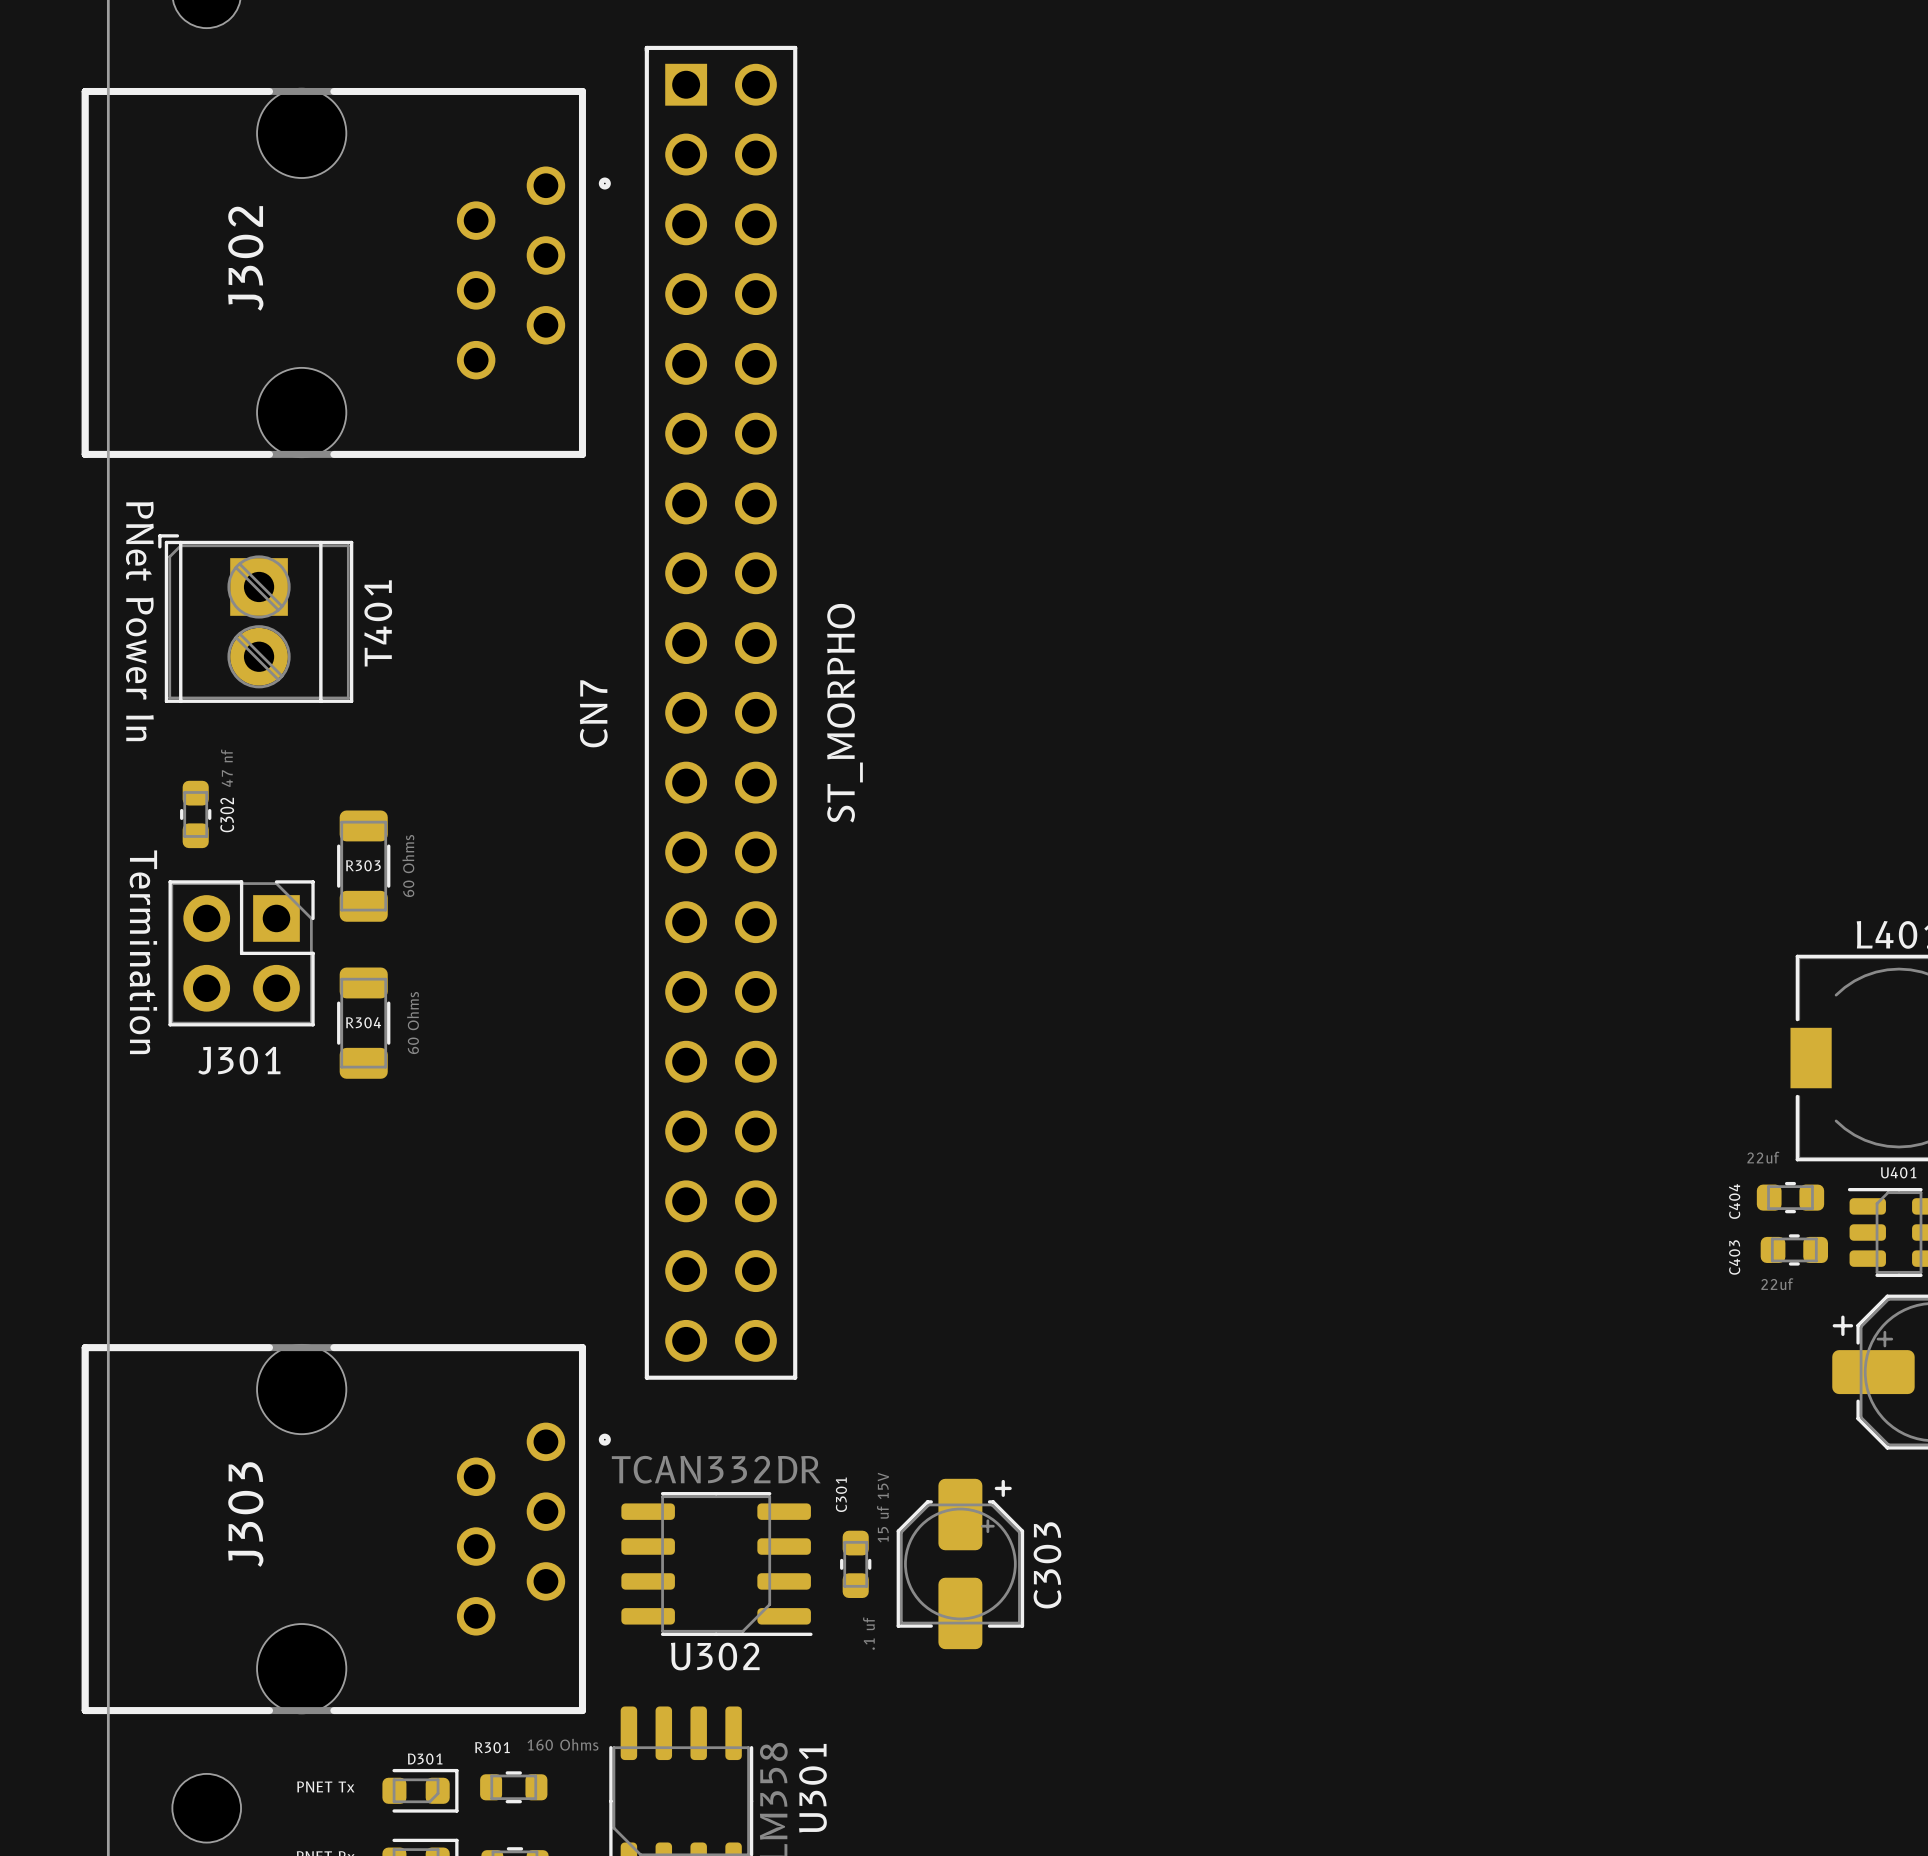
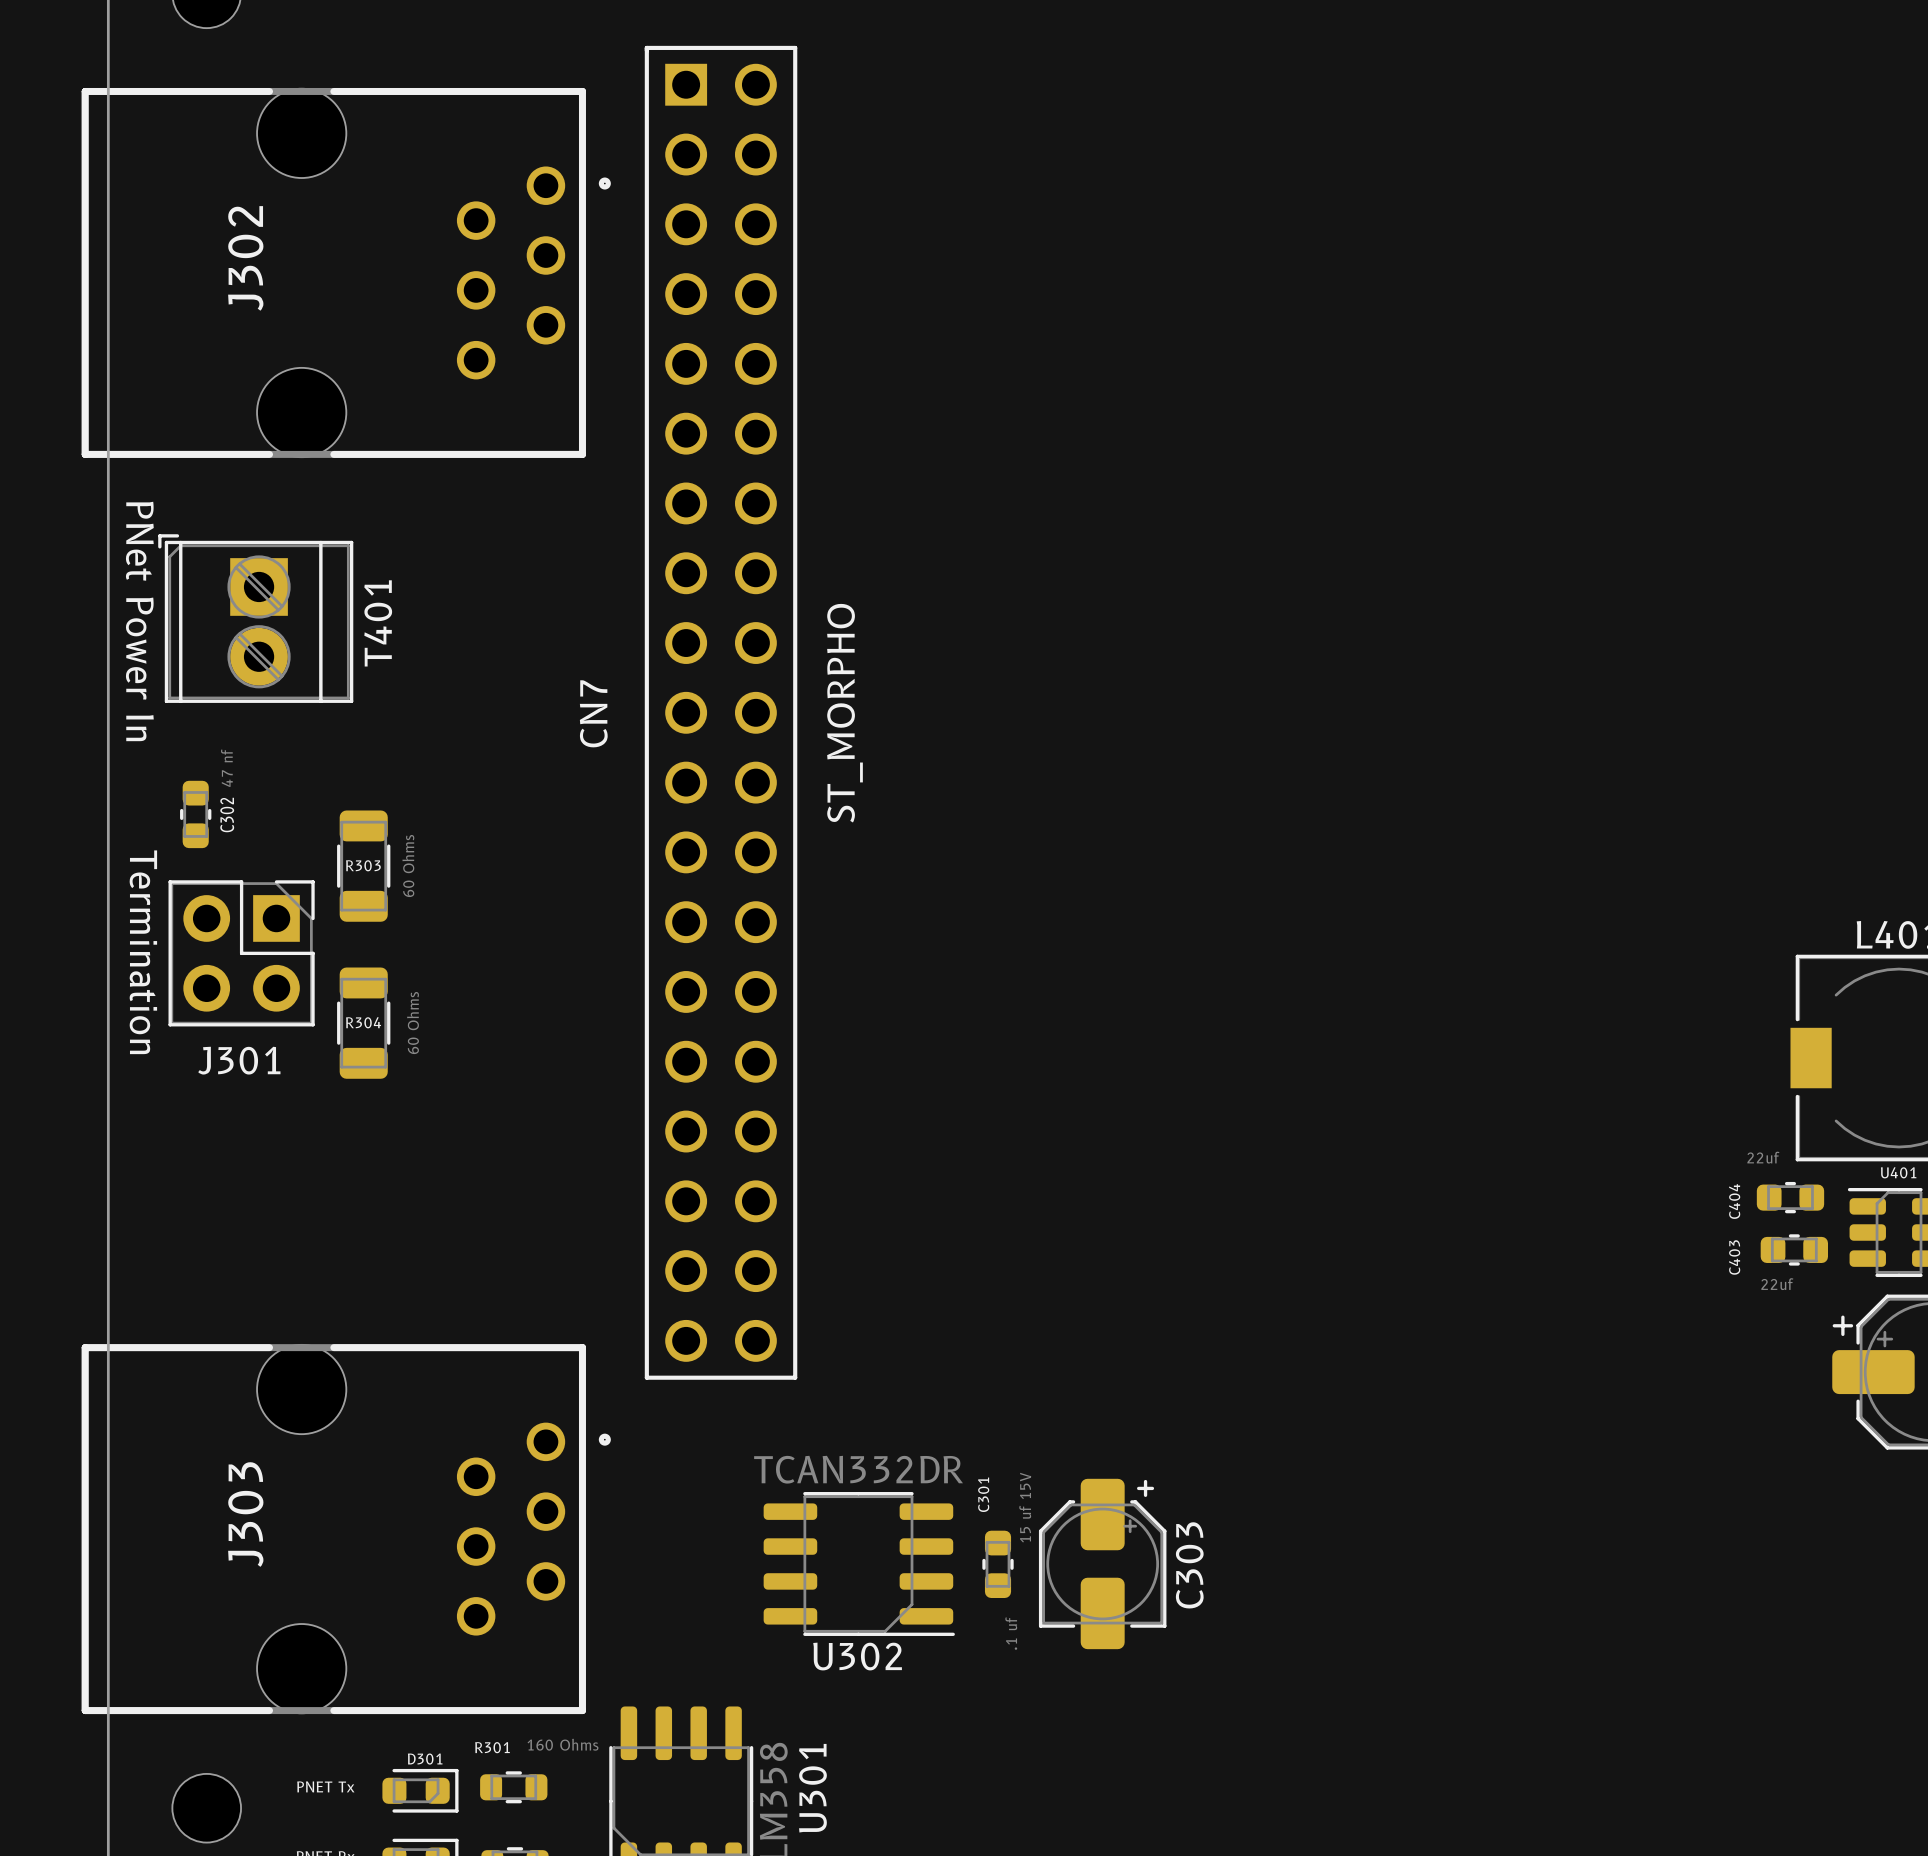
U302 position: (716, 1563) -> (859, 1563)
C303 position: (960, 1563) -> (1102, 1563)
C301 position: (855, 1564) -> (998, 1564)

